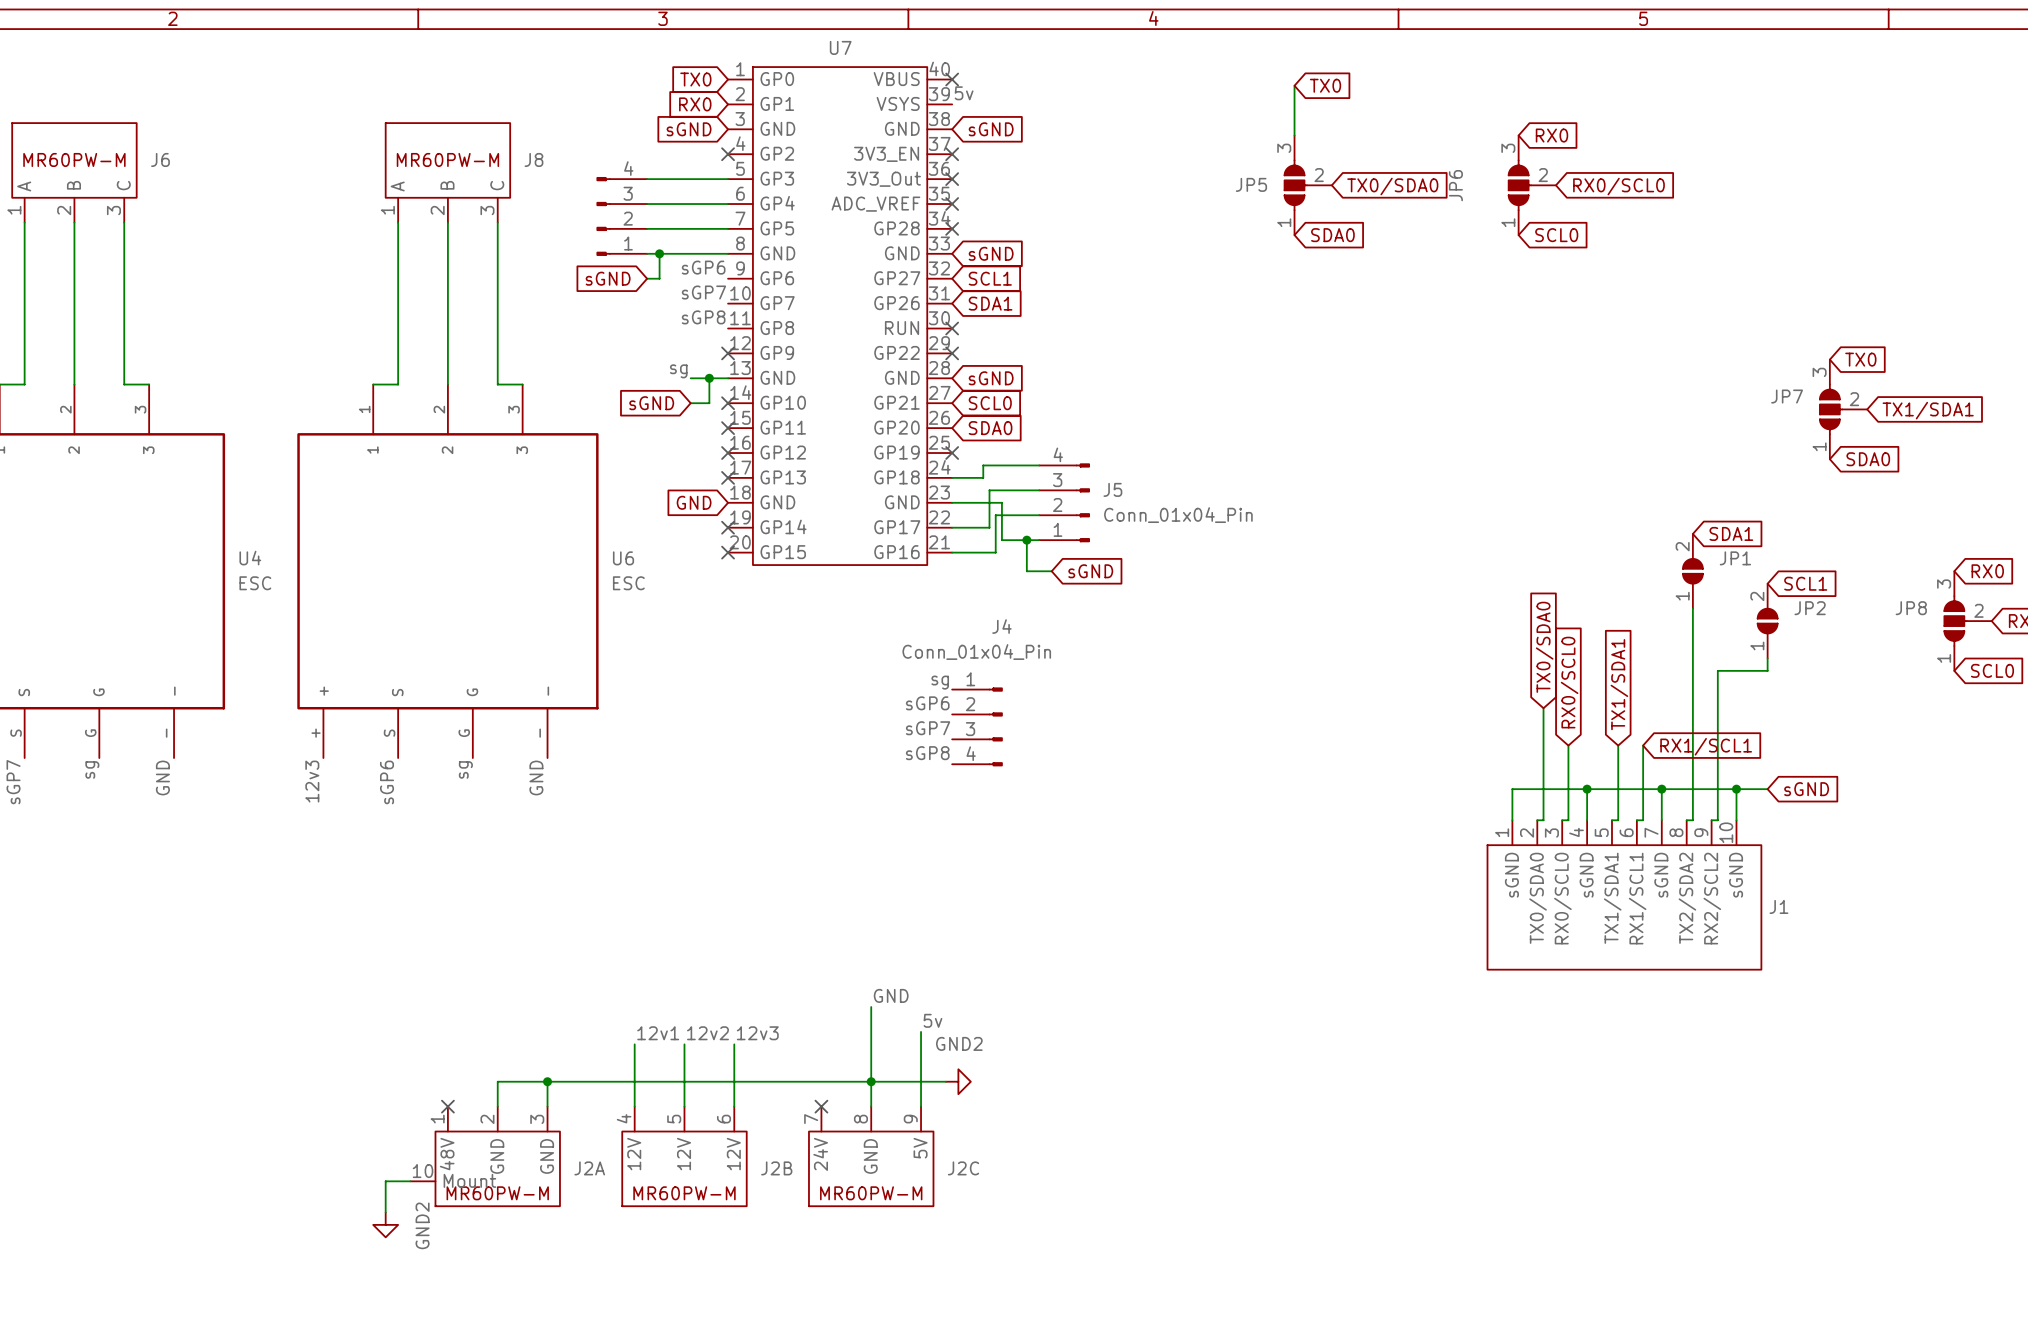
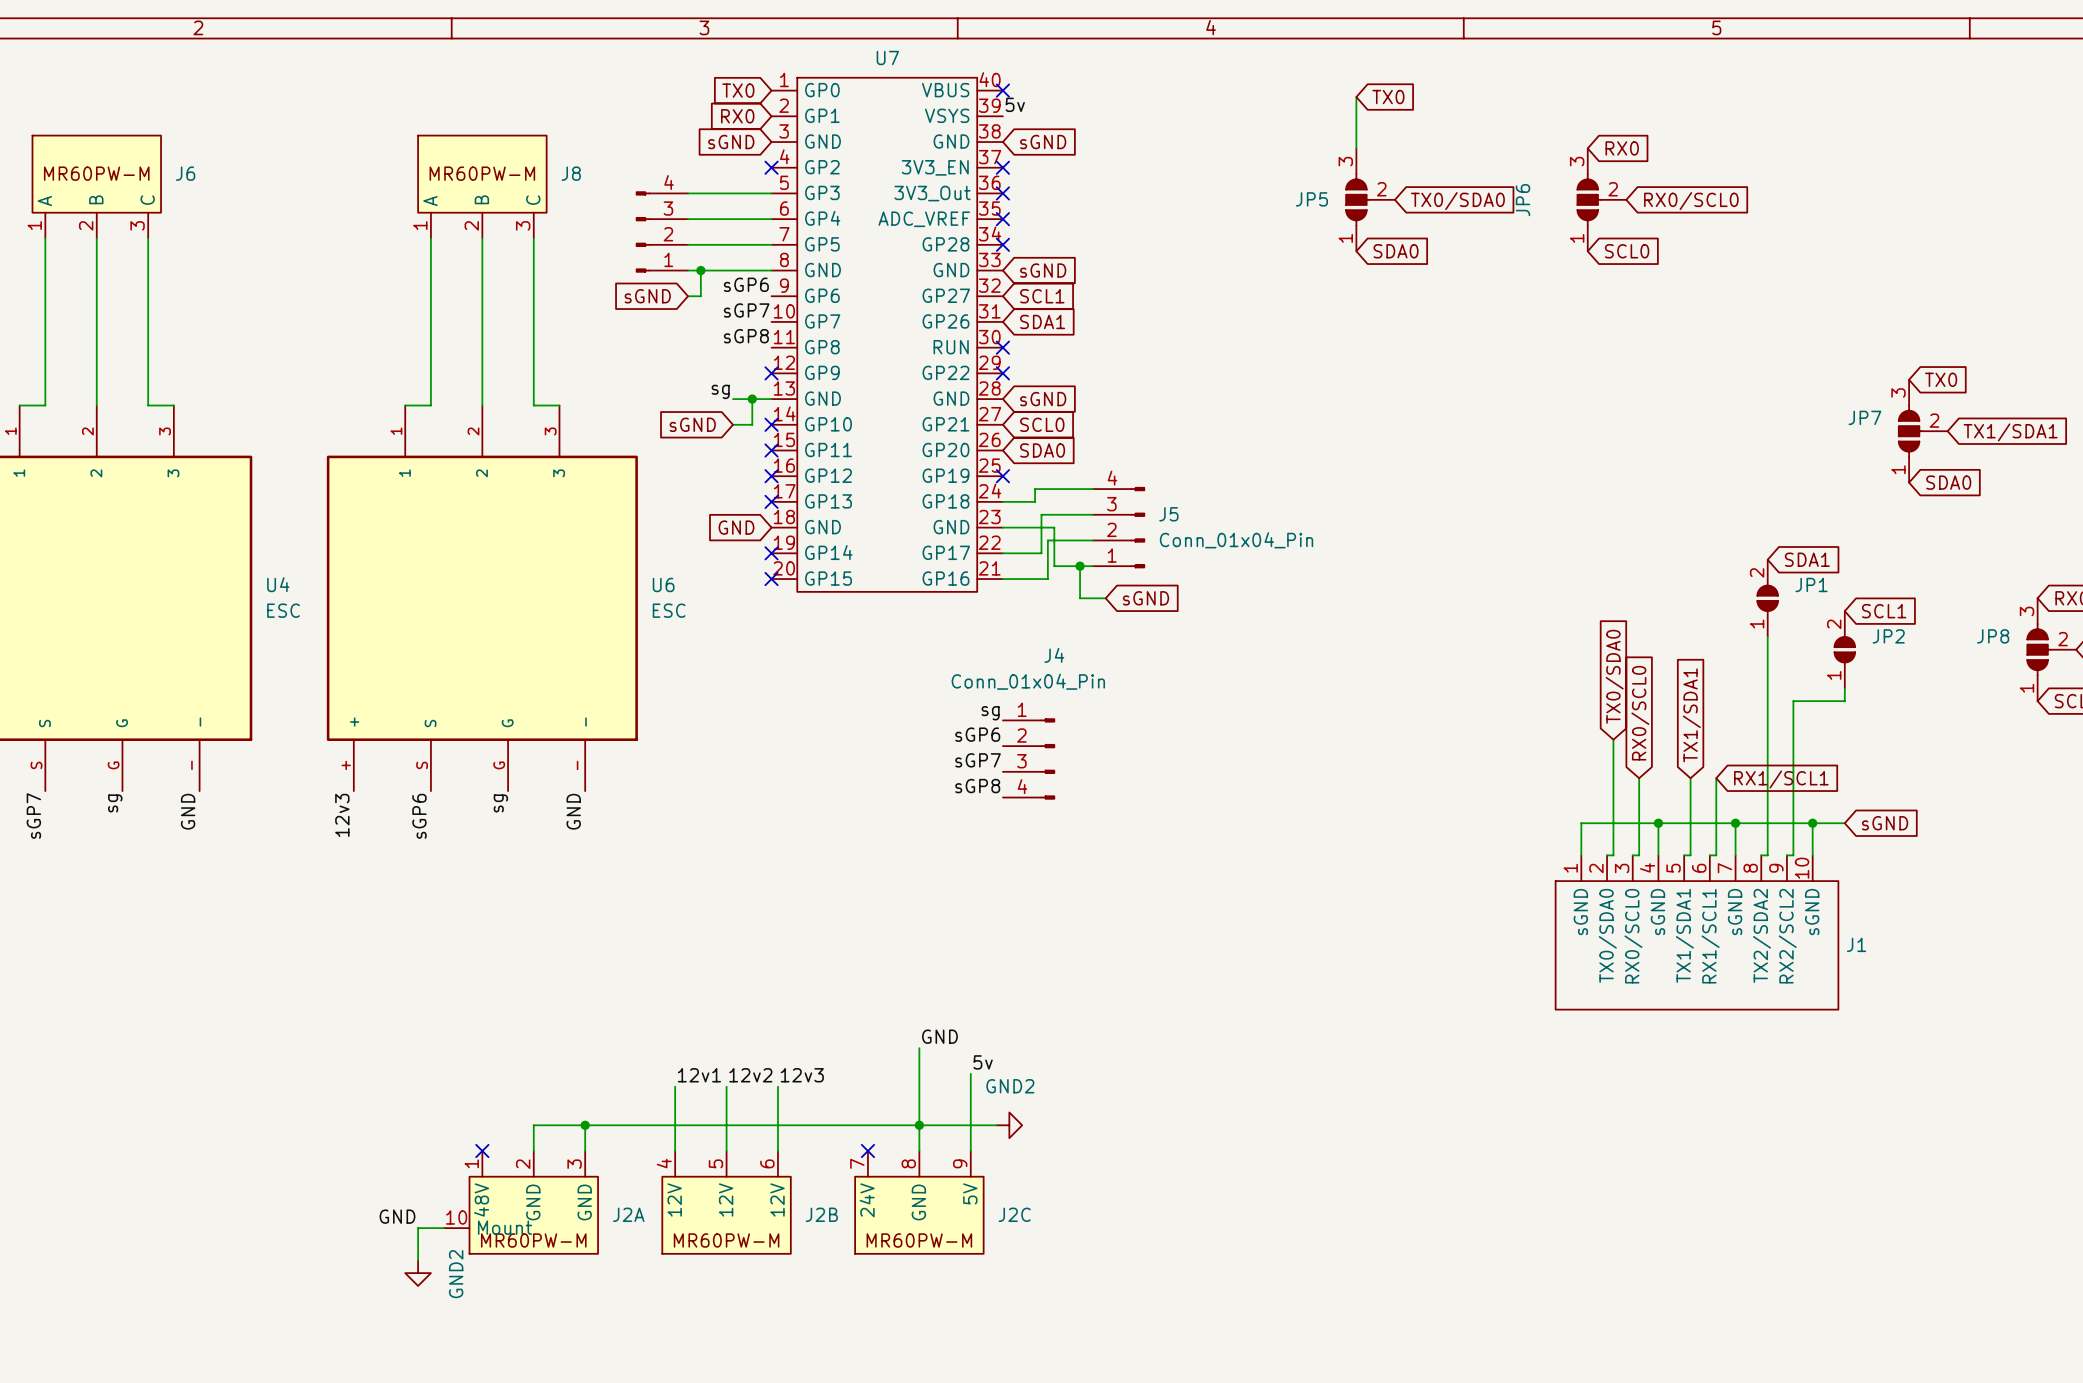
label: none -> GND (397, 1216)

